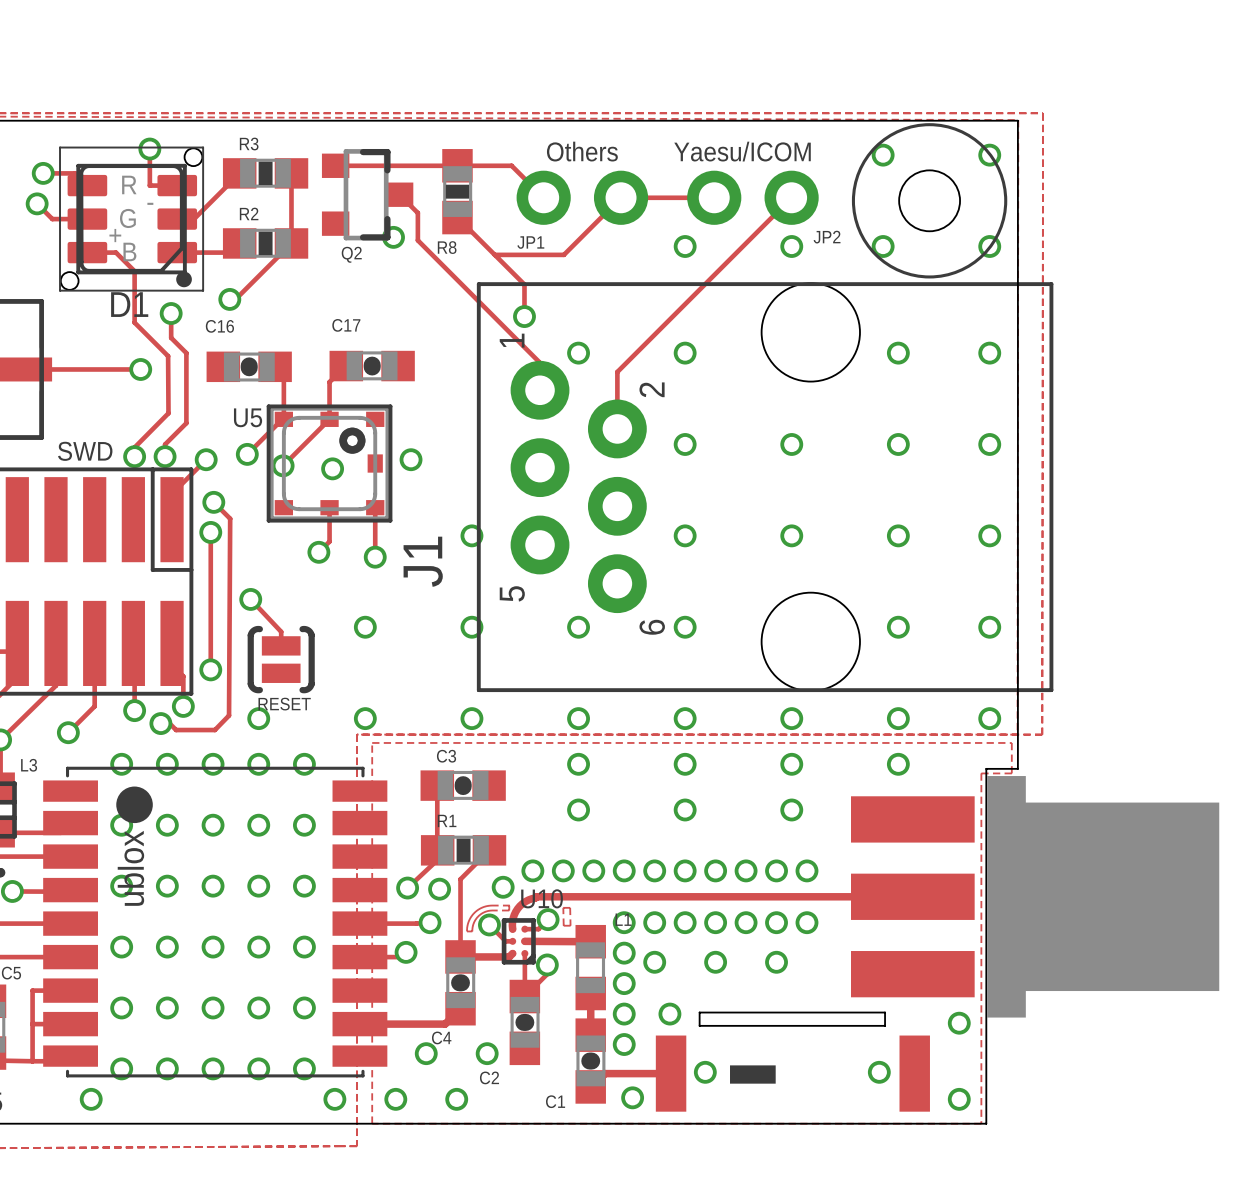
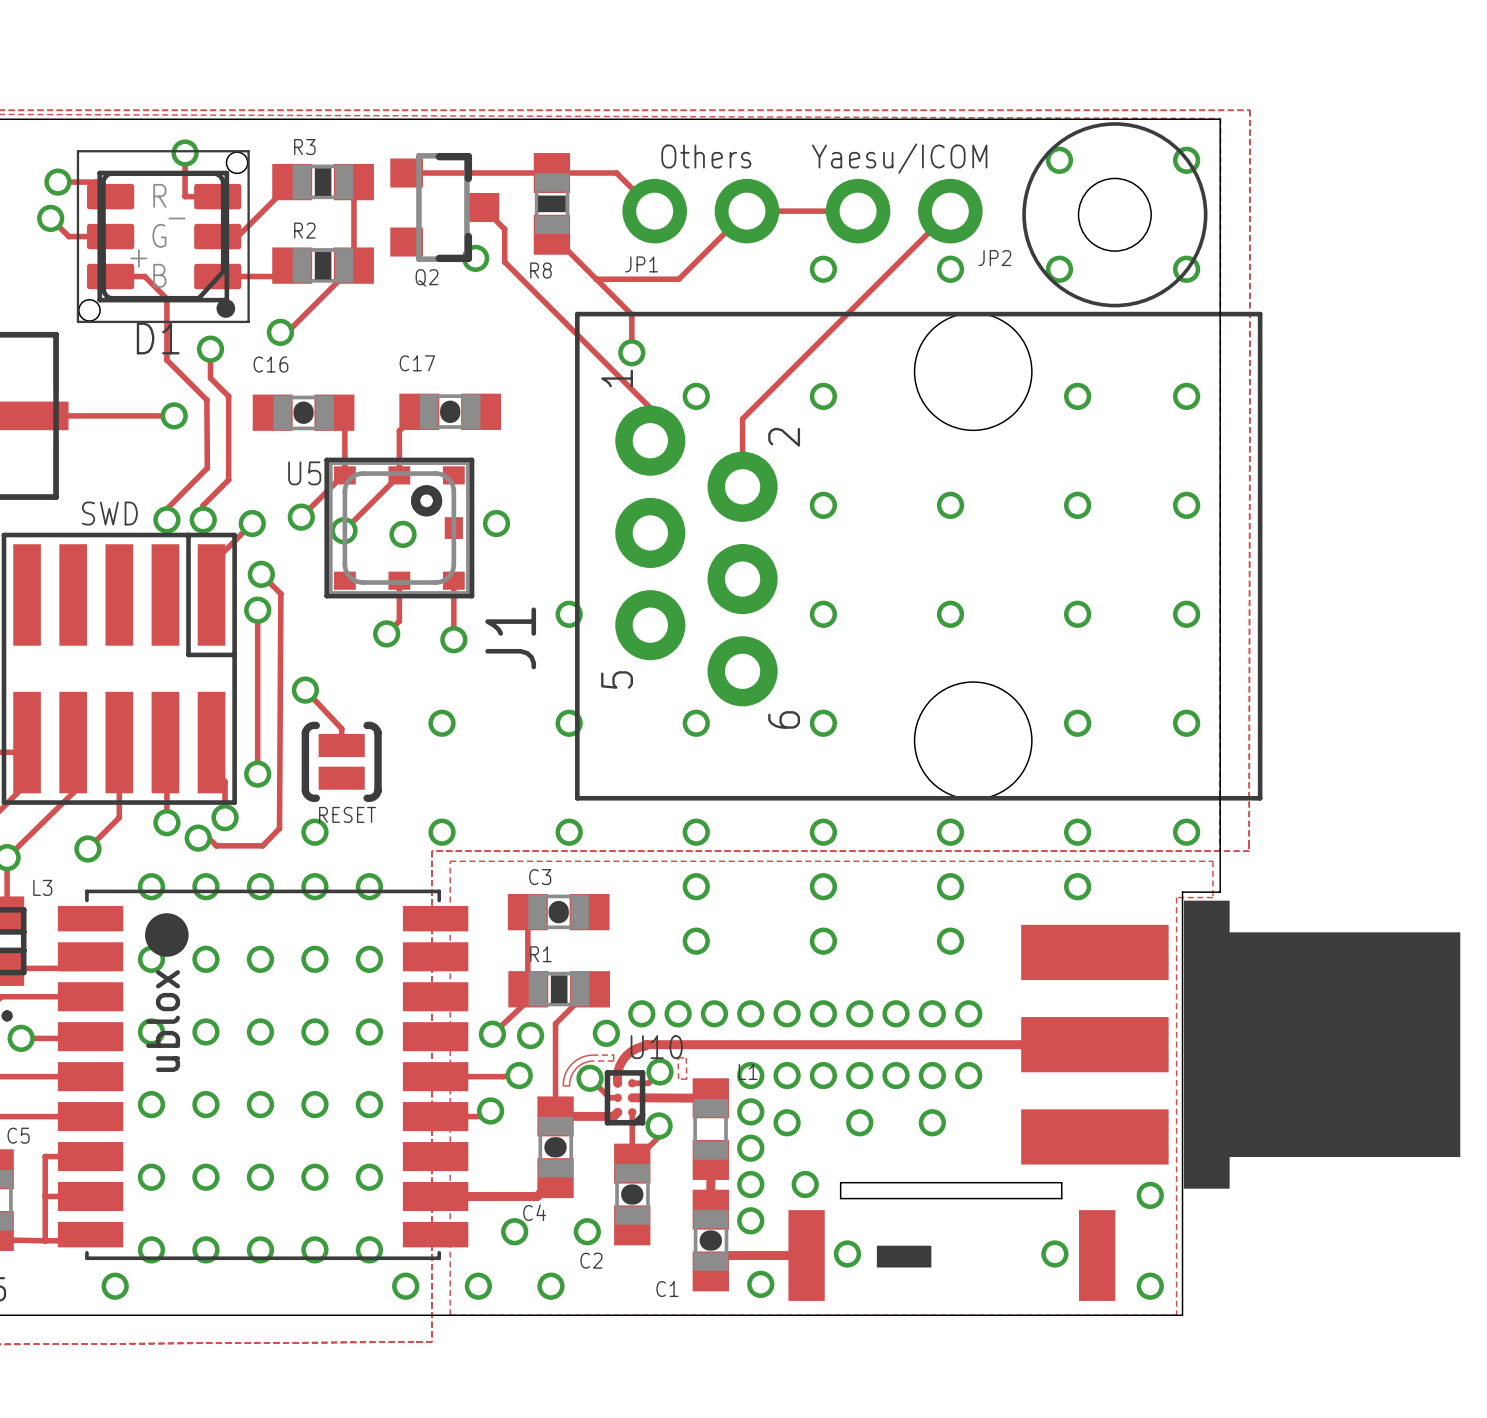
part footprint: [851, 776, 1220, 1018] -> [1021, 900, 1461, 1189]

